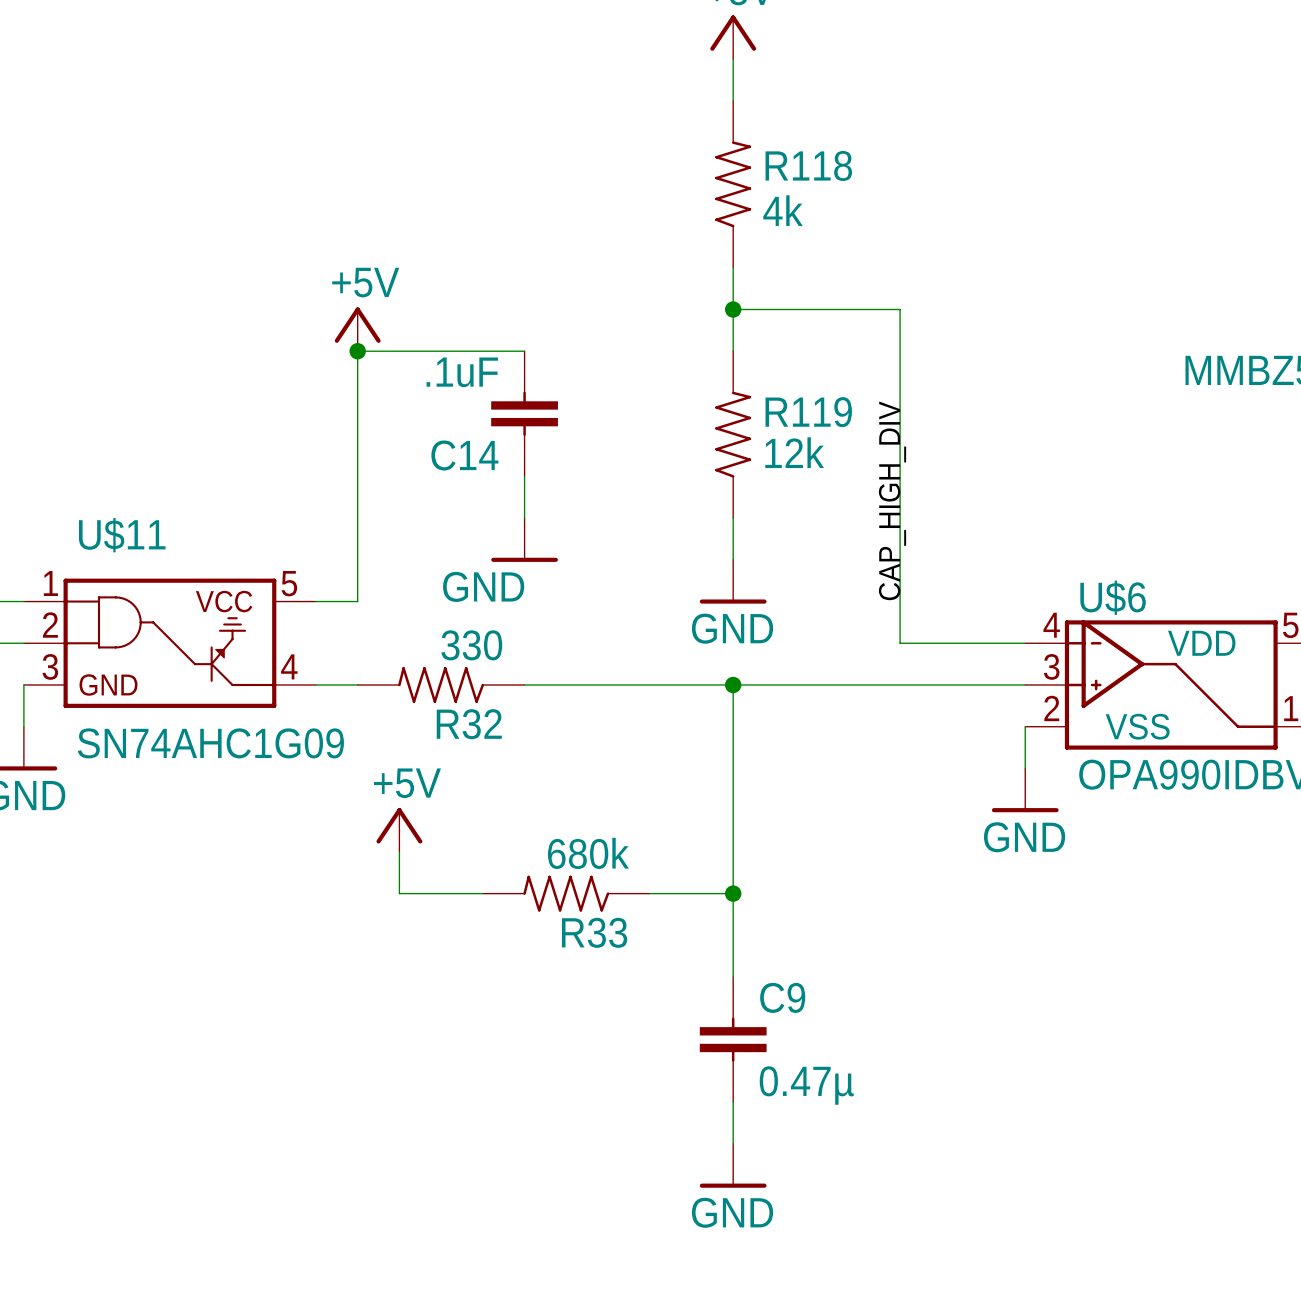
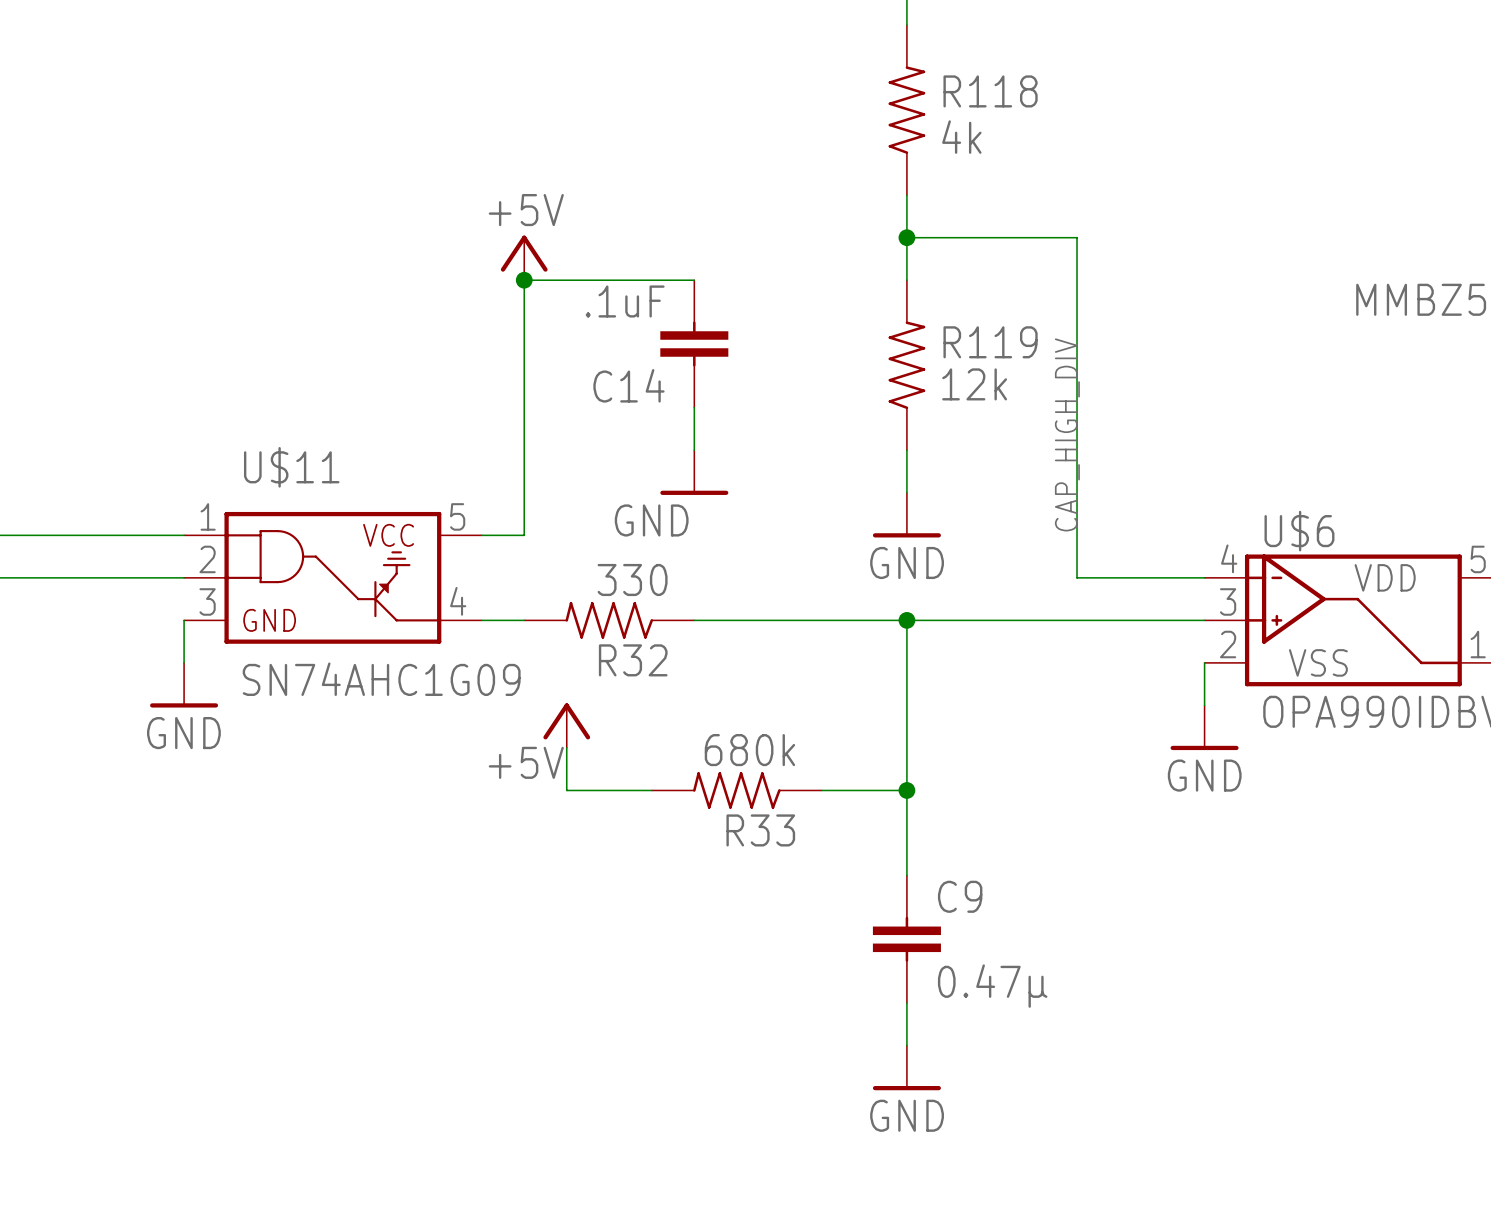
power symbol text position: +5V (407, 783) -> +5V (526, 762)
power symbol position: +5V (399, 829) -> +5V (566, 725)
wire: (399, 851) (399, 893) (482, 893) -> (566, 747) (566, 790) (651, 790)
R33 position: (566, 893) -> (736, 790)
wire: (649, 893) (733, 893) -> (821, 790) (906, 790)
junction position: (733, 893) -> (906, 790)
C9 position: (733, 1039) -> (906, 939)
power symbol position: GND (733, 1165) -> GND (906, 1067)

